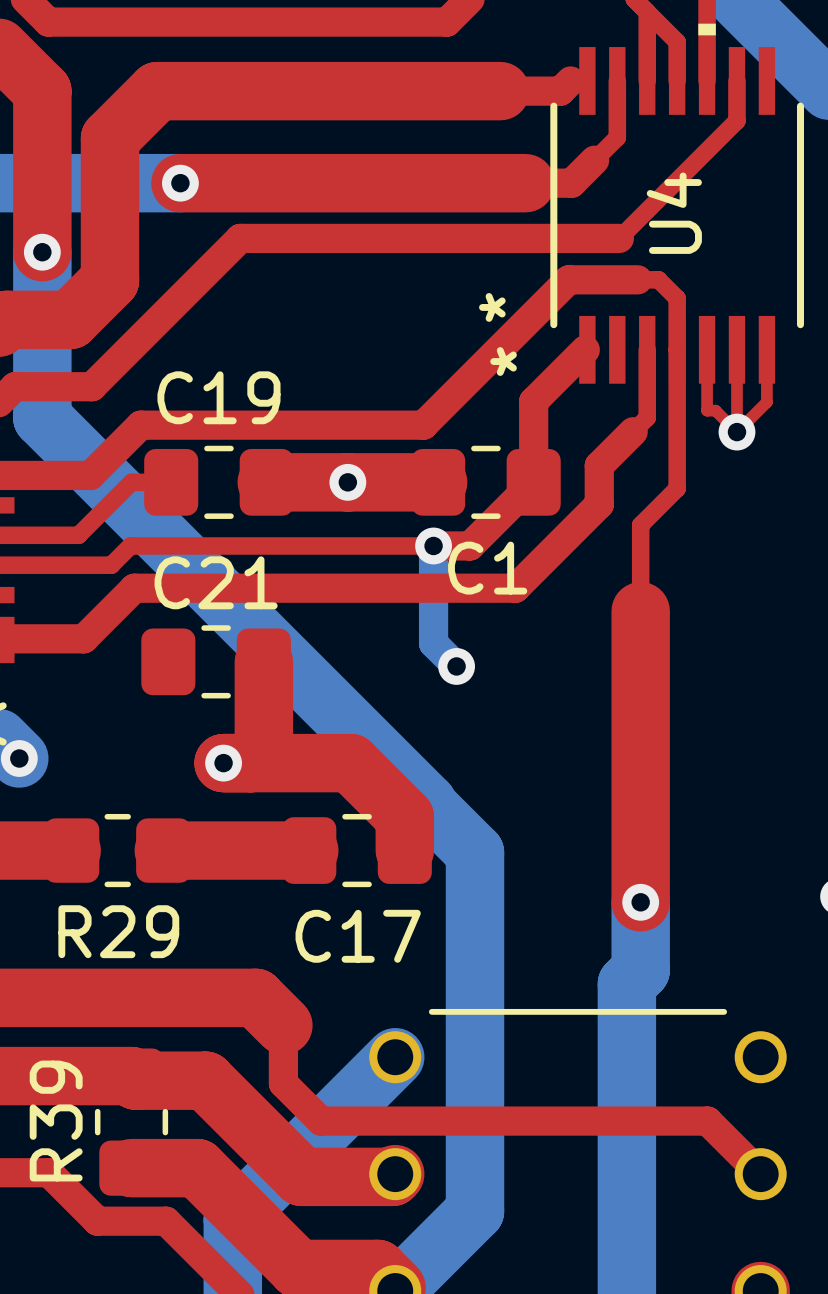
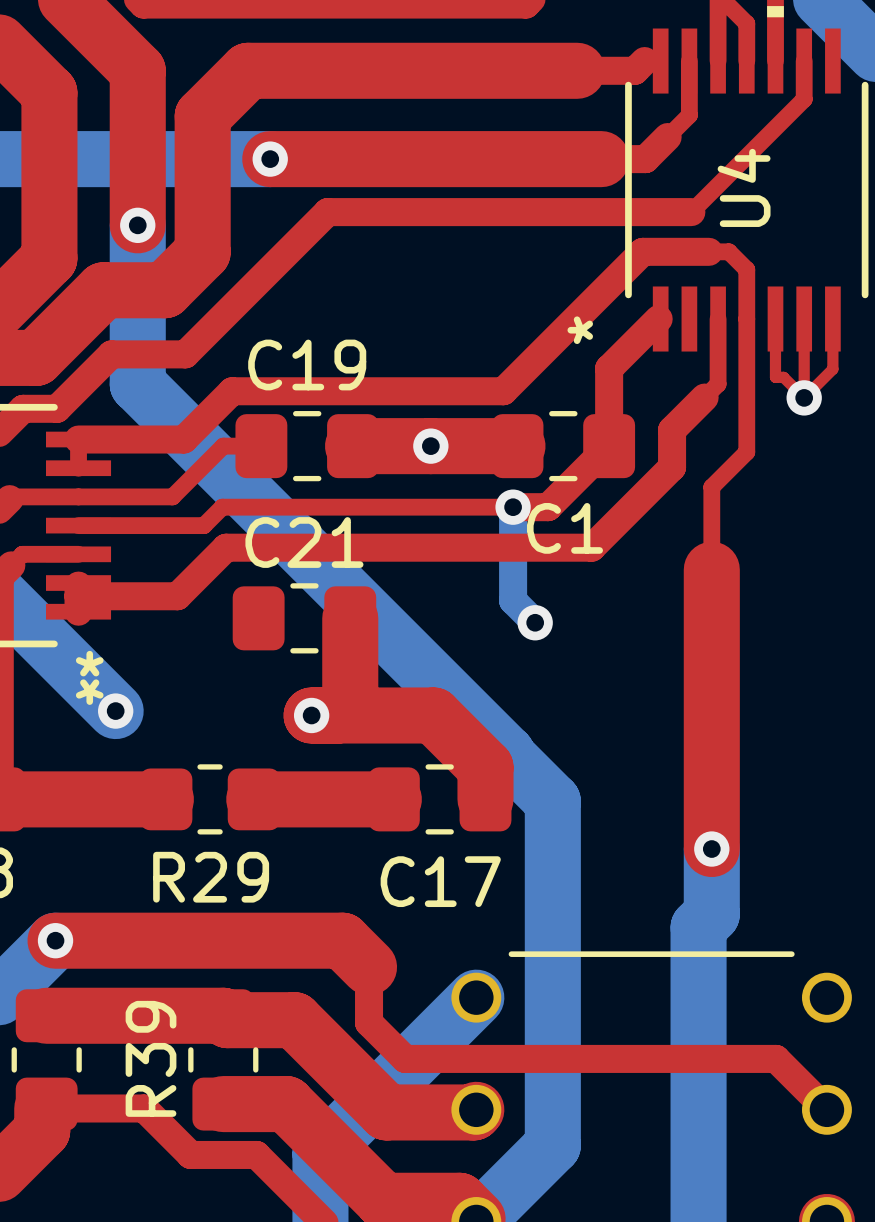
U4 text: * (492, 307) -> none

